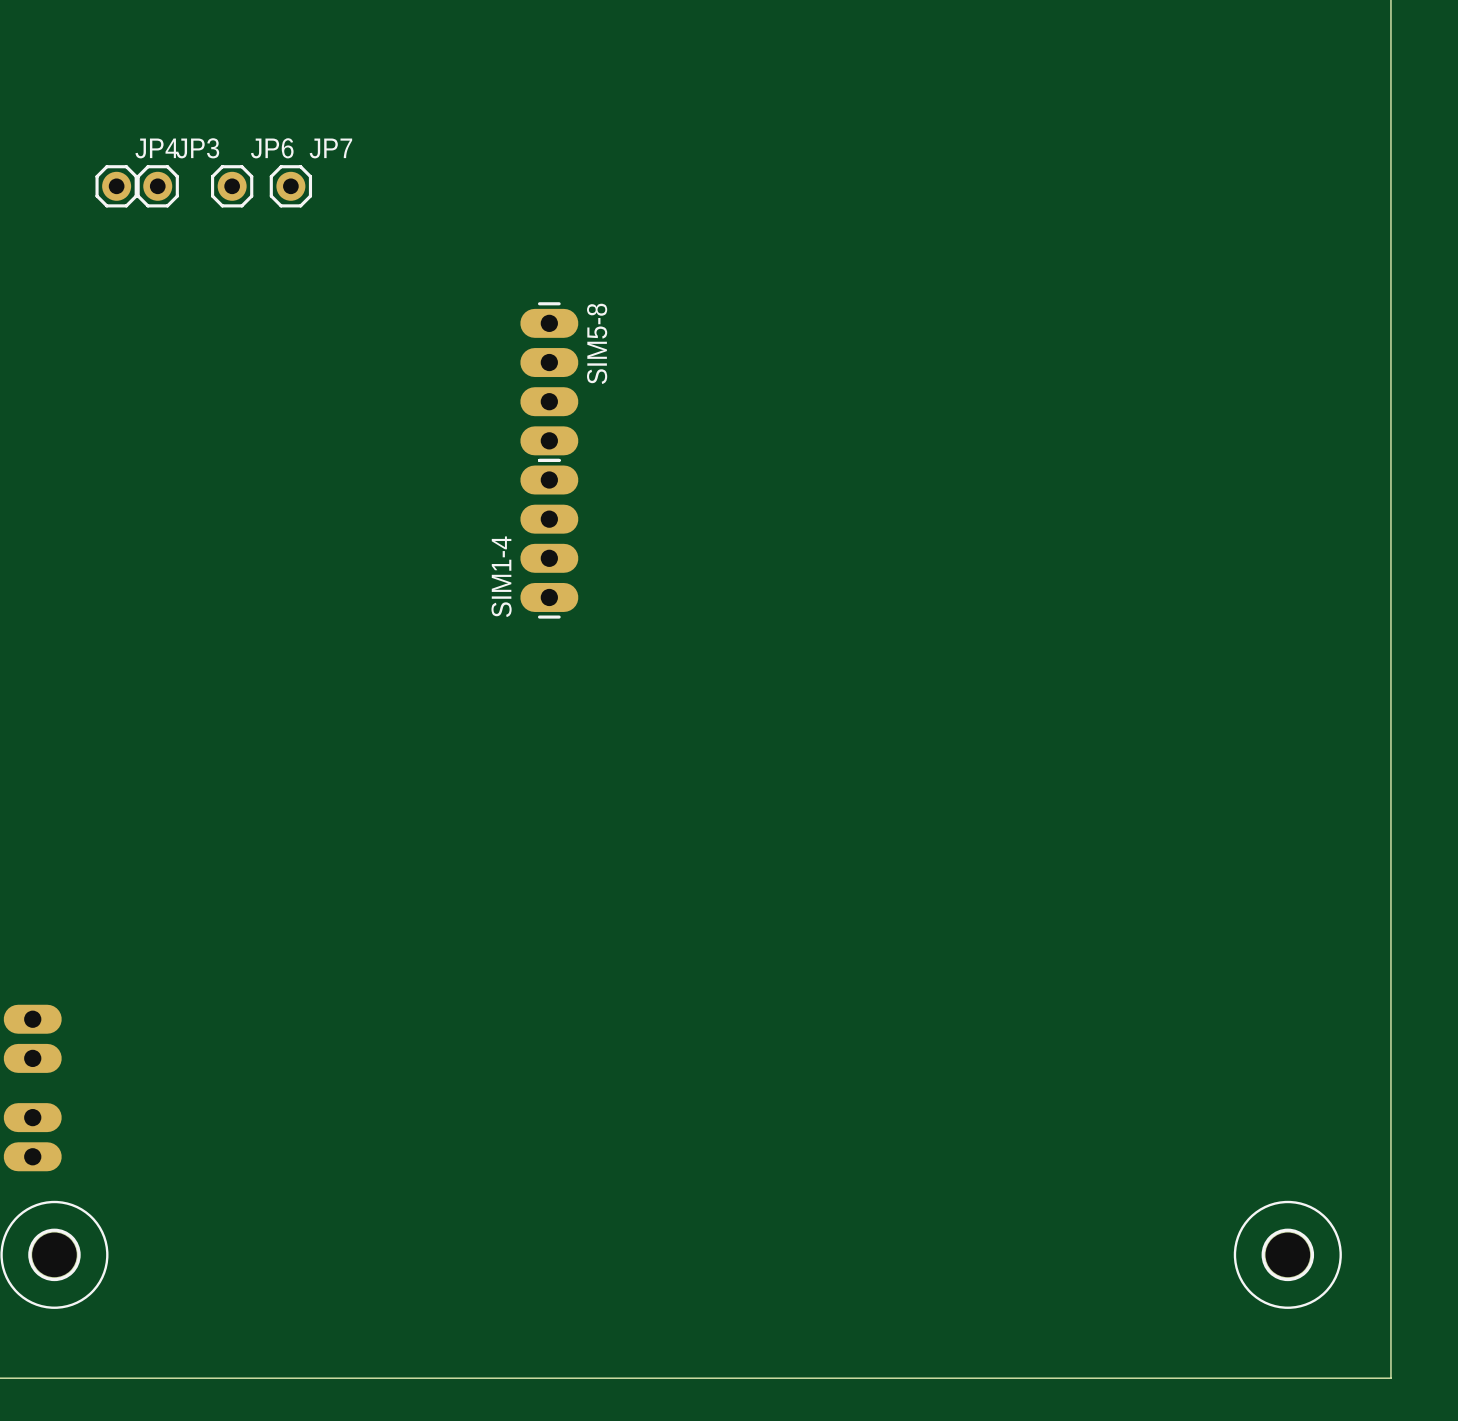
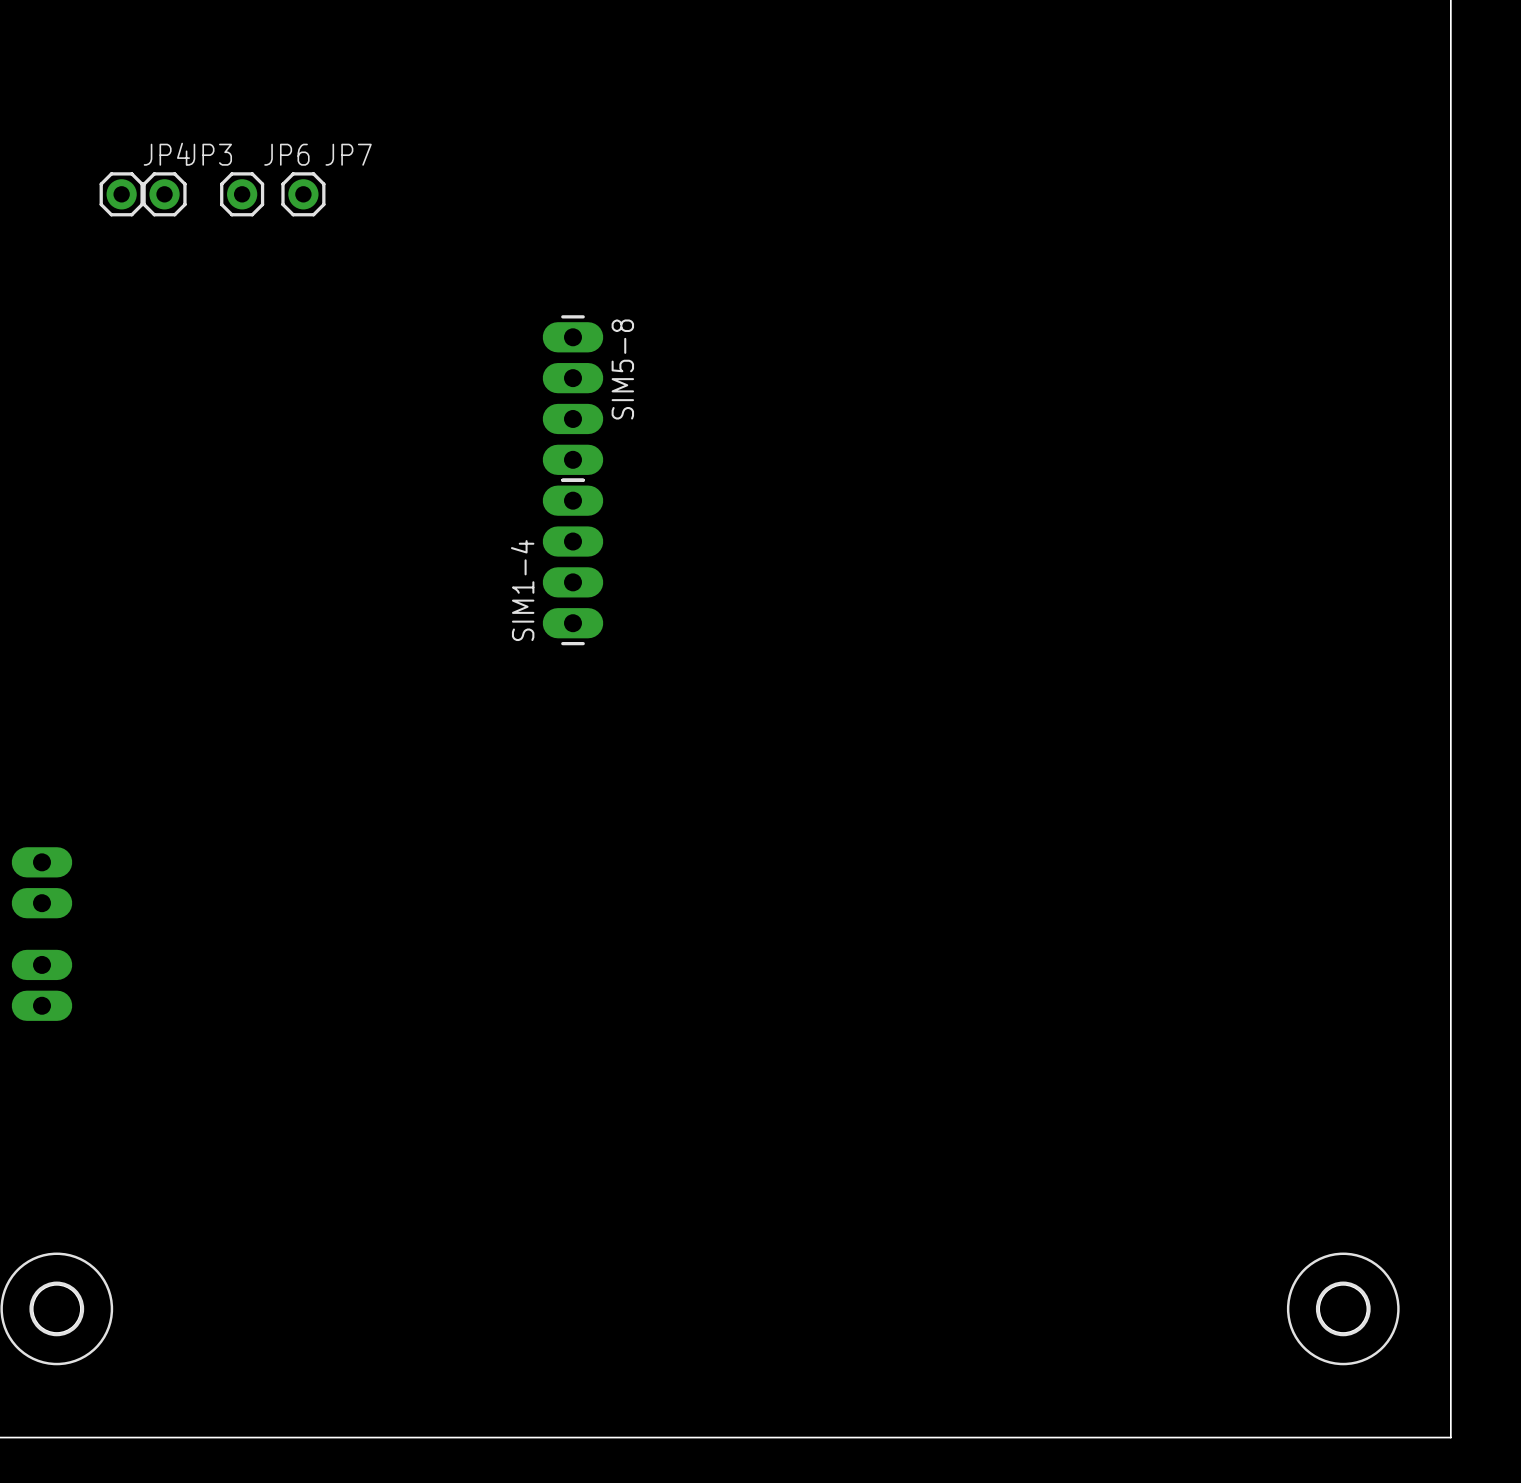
part: none -> (42, 882)
part position: (32, 1038) -> (42, 985)
part: (32, 1137) -> none

